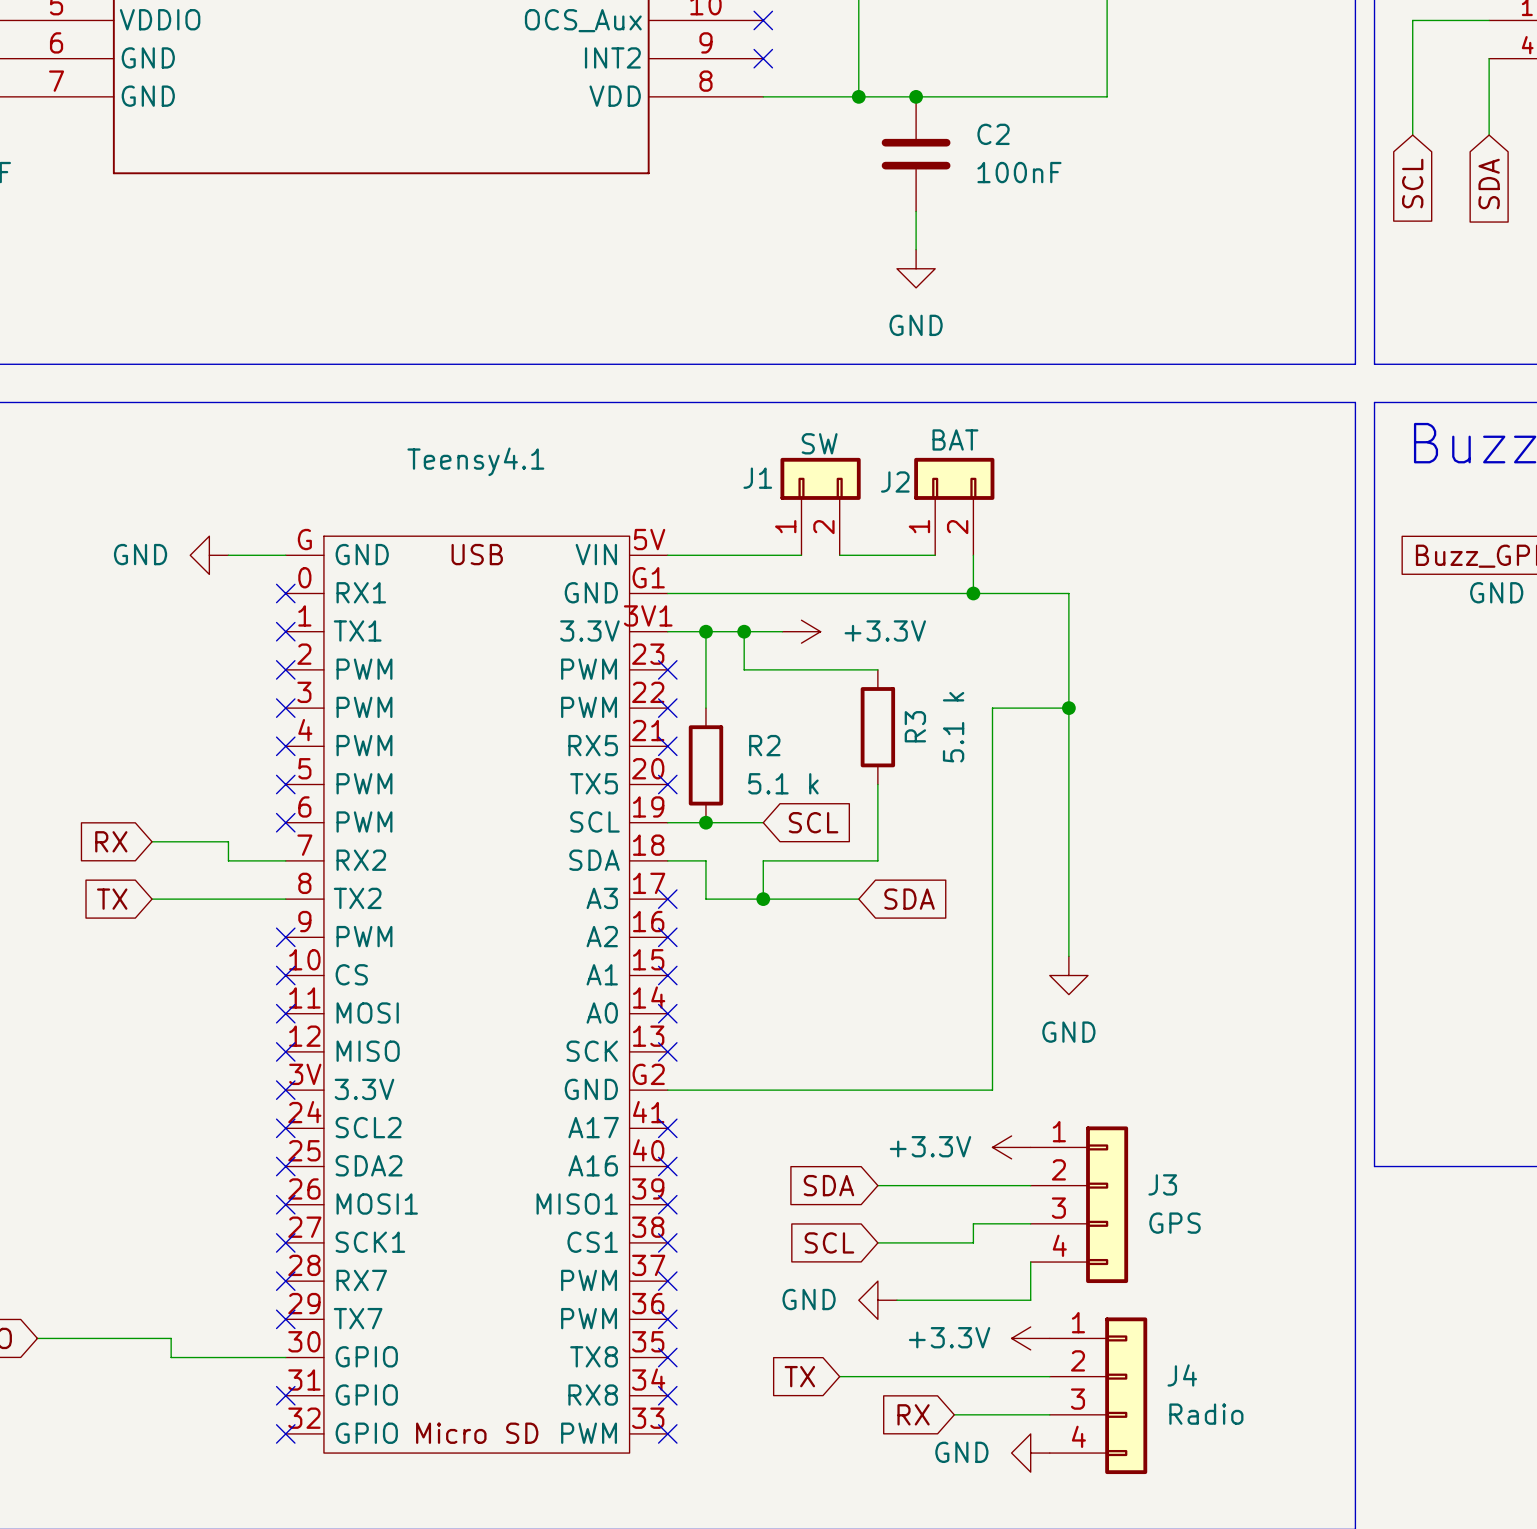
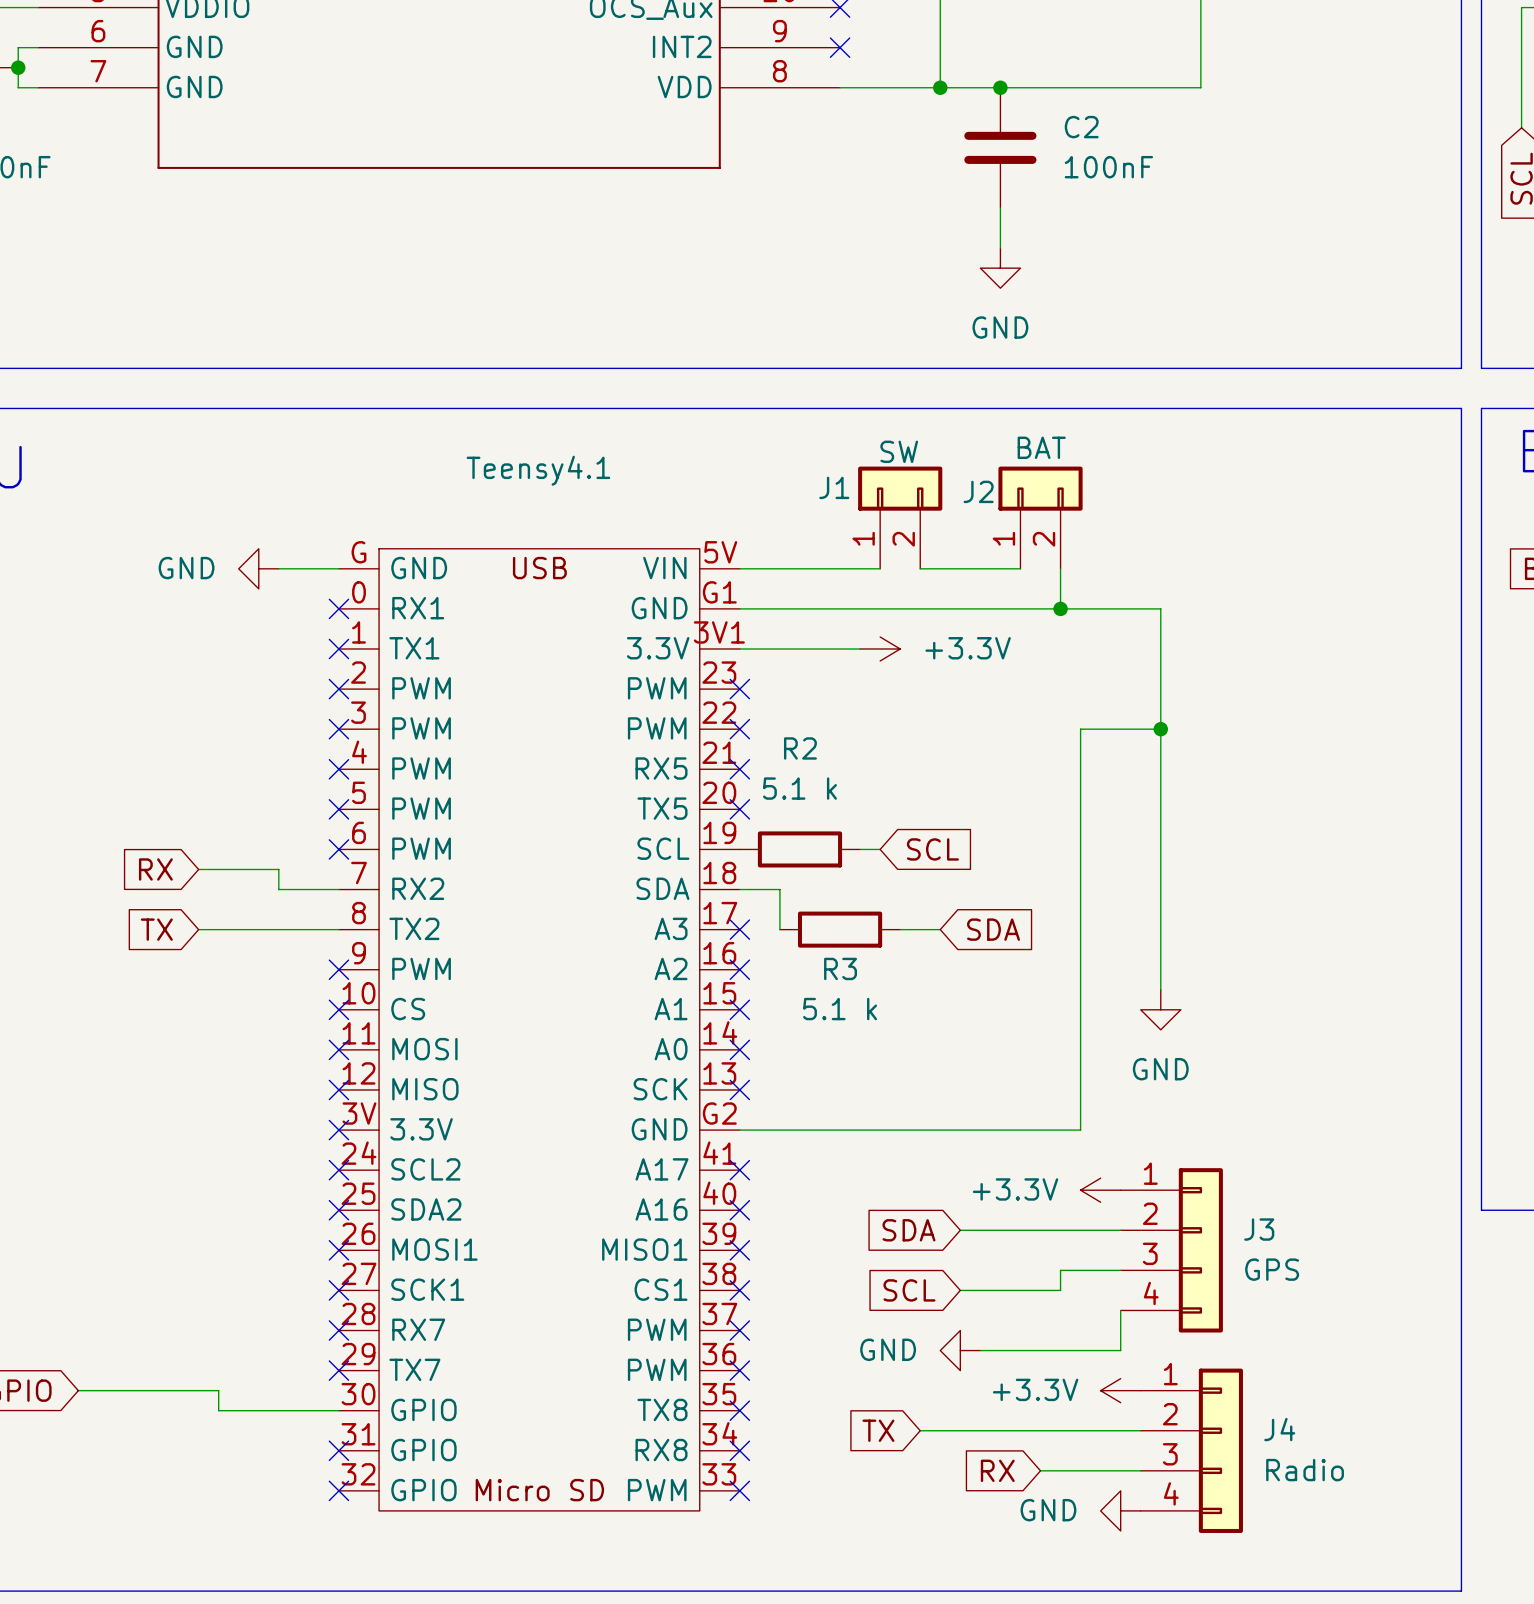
wire: (705, 631) (705, 708) -> none
junction: (705, 631) -> none
wire: (744, 631) (744, 669) (877, 669) -> none
junction: (744, 631) -> none
R3 rotation: 0° (877, 727) -> 90° clockwise (840, 929)
R3 position: (877, 727) -> (840, 929)
R2 name position: R2 (764, 745) -> R2 (800, 748)
R2 rotation: 0° (705, 765) -> 90° clockwise (799, 849)
R2 value position: 5.1 k (783, 783) -> 5.1 k (799, 788)
wire: (877, 784) (877, 860) (763, 860) (763, 899) -> none
wire: (667, 822) (763, 822) -> none
junction: (705, 822) -> none
wire: none -> (860, 849) (880, 849)
global label position: SCL (813, 822) -> SCL (932, 849)
wire: (705, 899) (820, 899) -> none
junction: (763, 899) -> none

